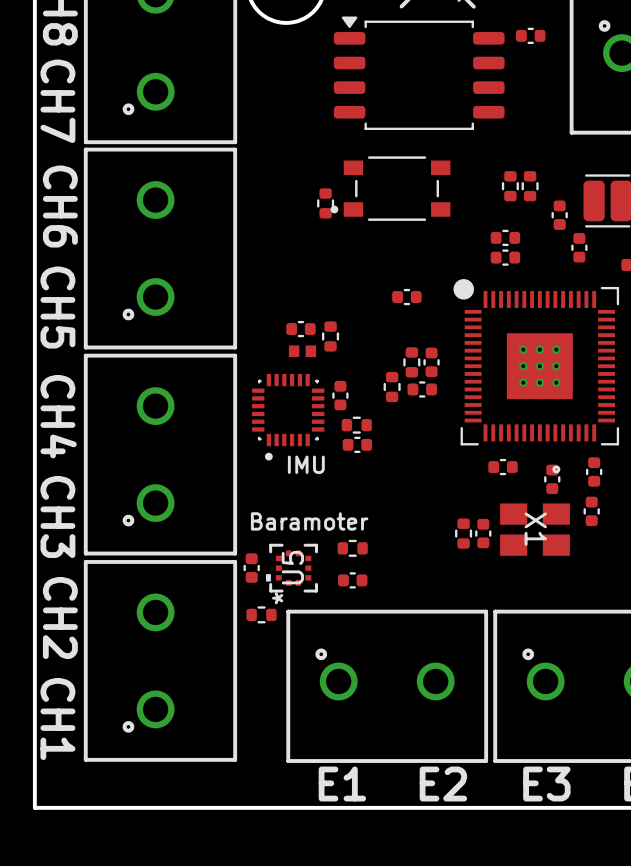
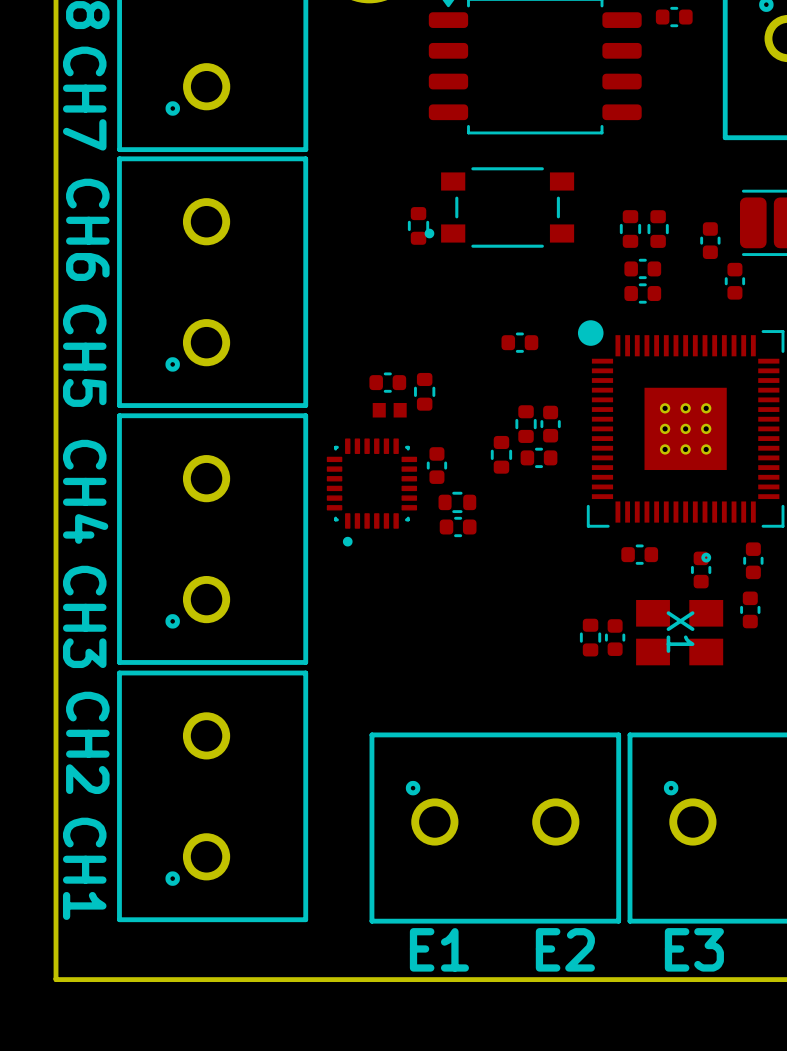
part: (510, 186) -> none
part: (530, 186) -> none
part: none -> (630, 229)
part: none -> (658, 229)
text: IMU (306, 464) -> none
text: Baramoter (309, 521) -> none
part: (352, 548) -> none
part: (251, 568) -> none
U5: (291, 568) -> none
part: (352, 580) -> none
part: (261, 614) -> none

